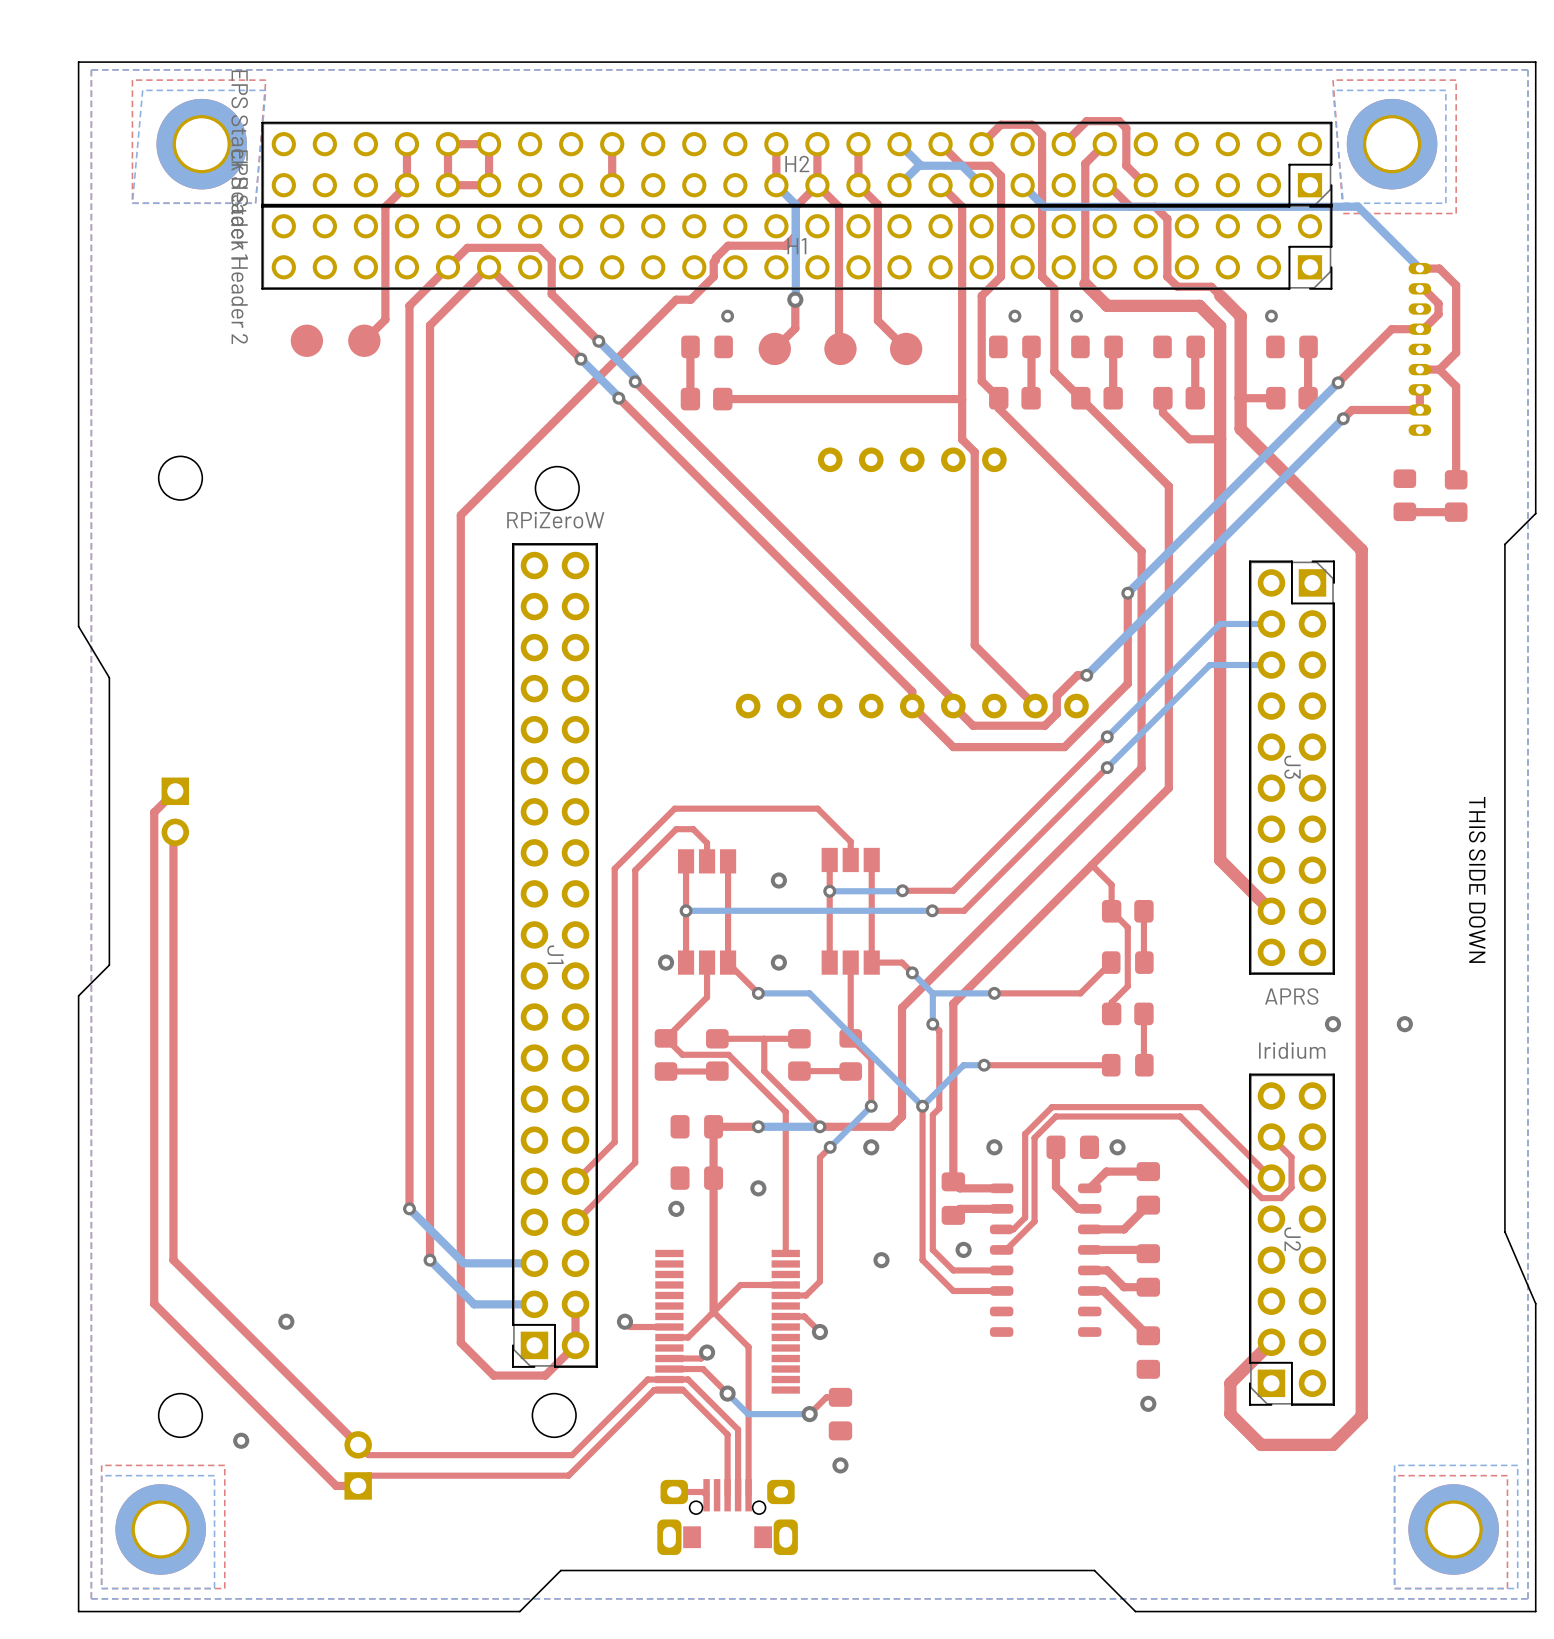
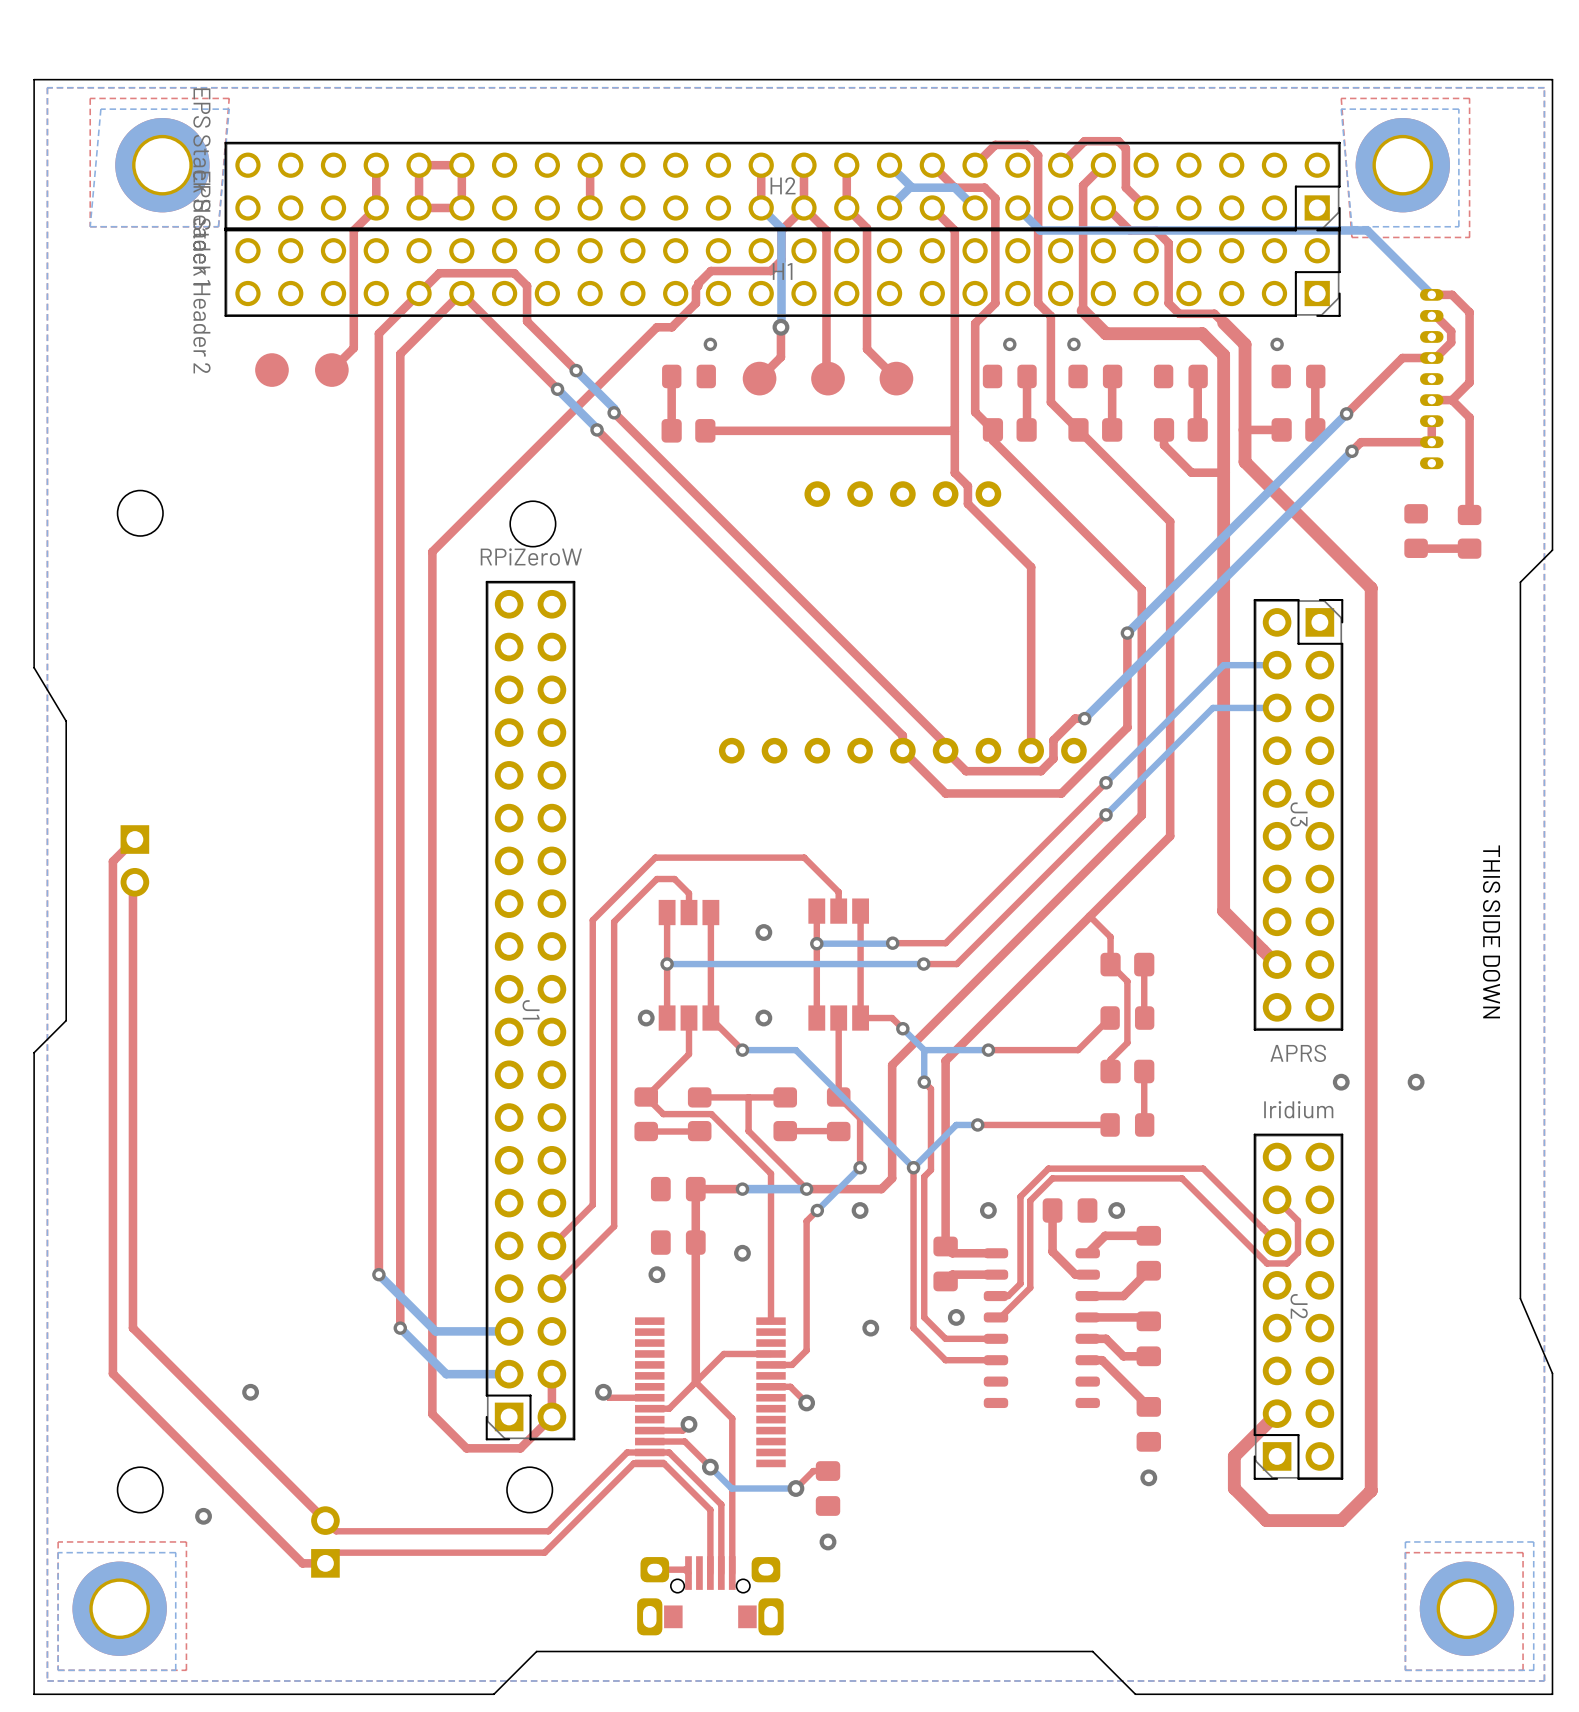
top track: (974, 469) (974, 645) (1035, 706) -> (967, 503) (1031, 567) (1031, 750)

